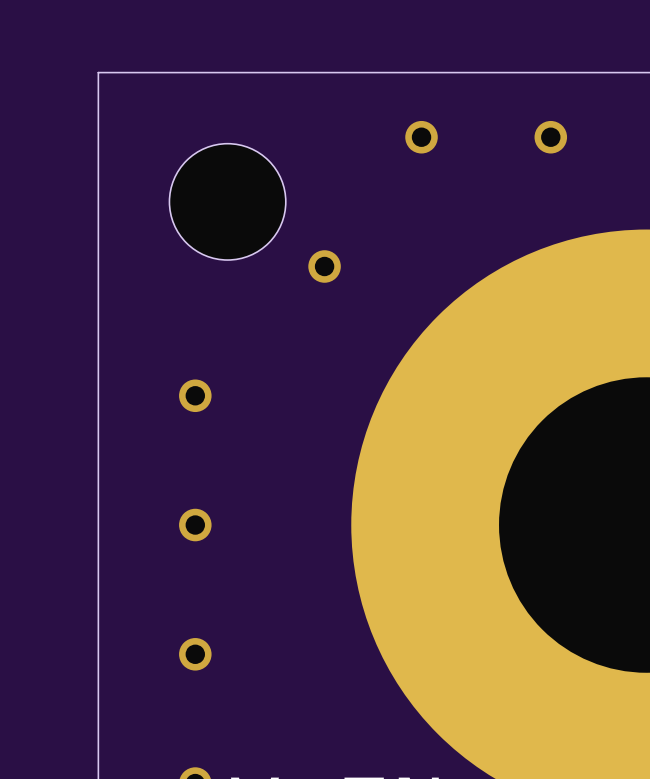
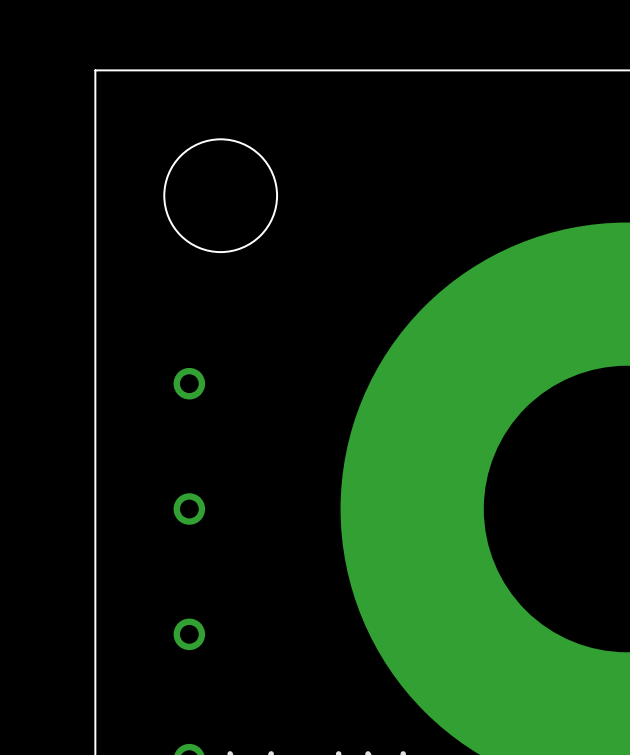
via: (421, 137) -> none
via: (550, 137) -> none
via: (324, 266) -> none

